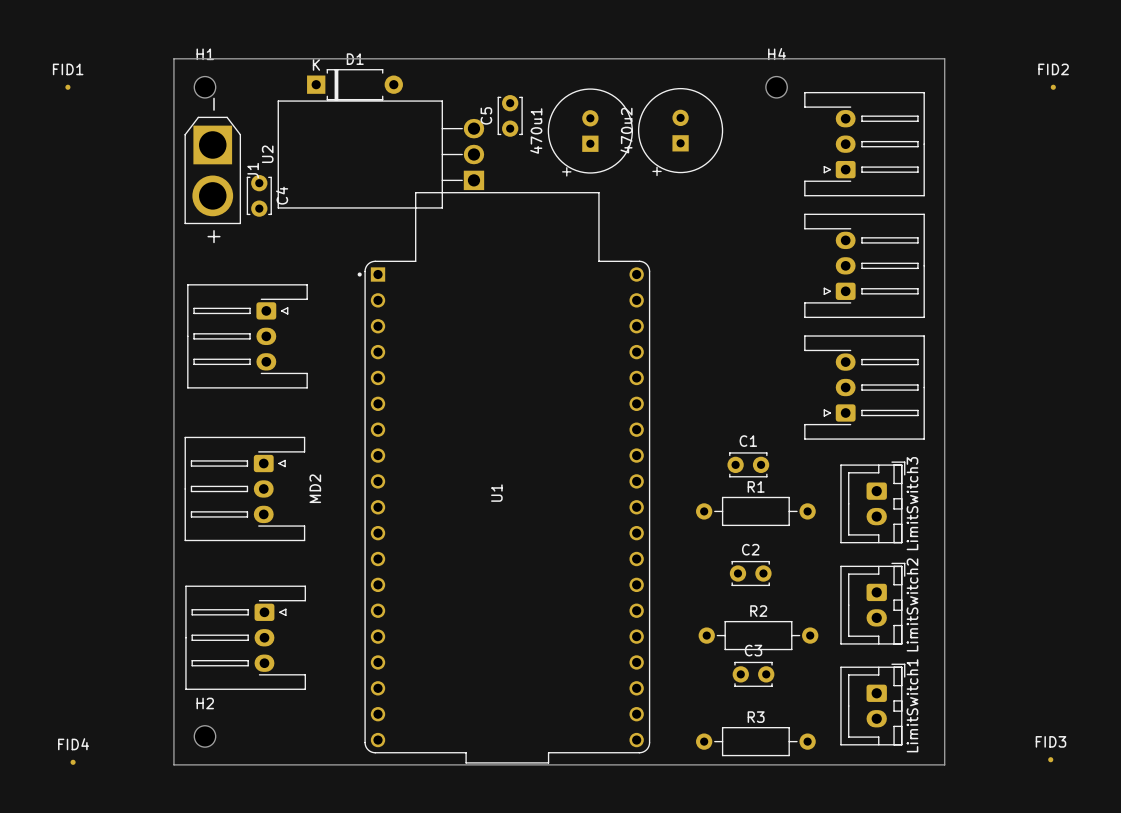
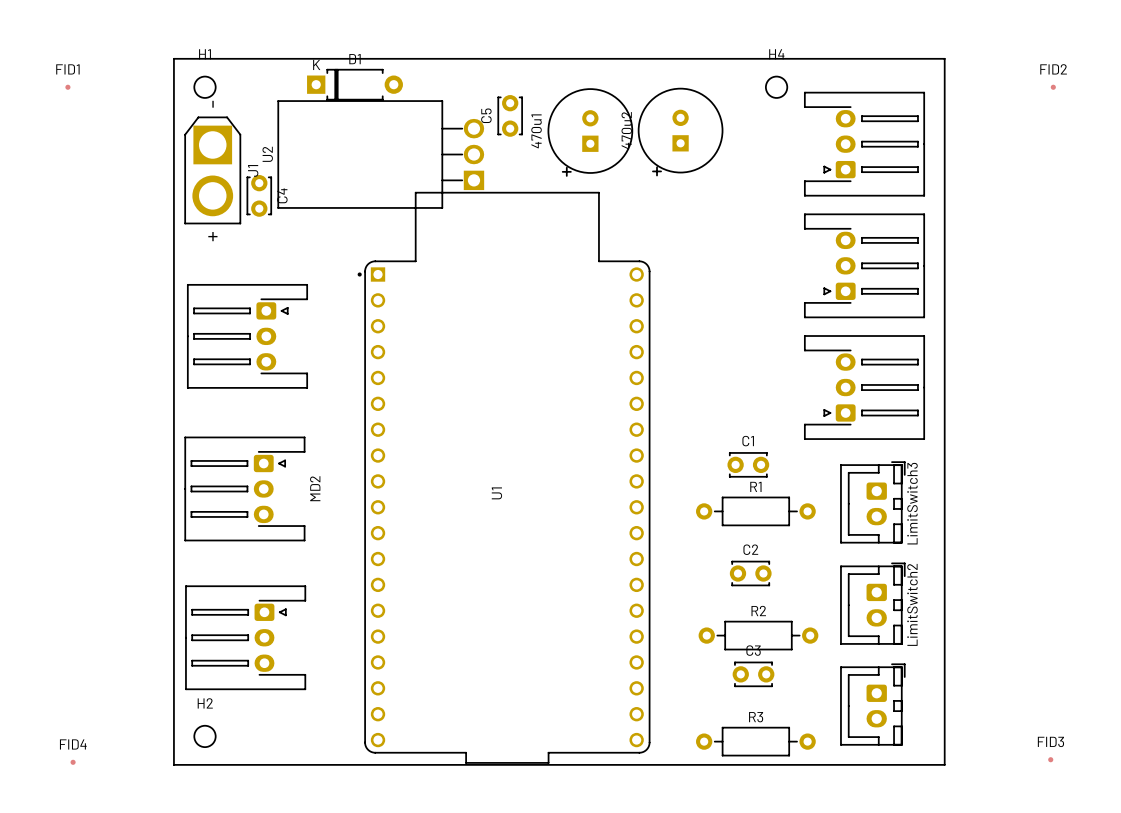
LimitSwitch1 name: LimitSwitch1 (912, 705) -> none

